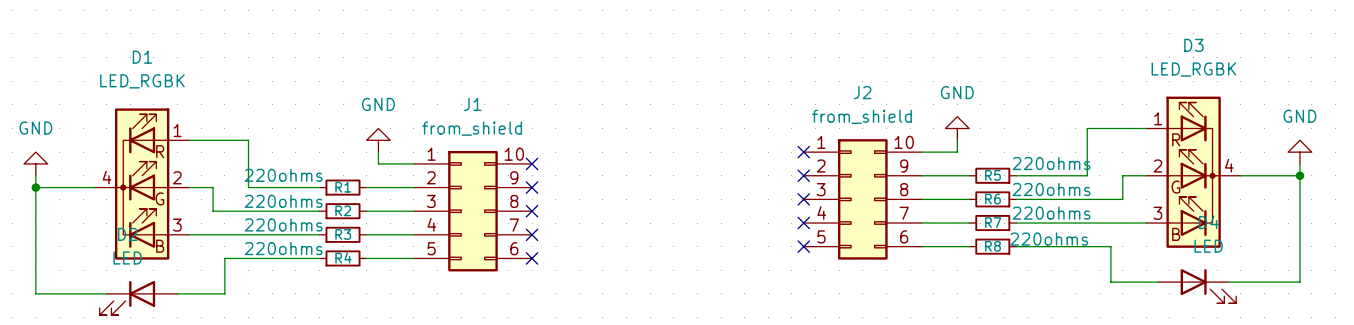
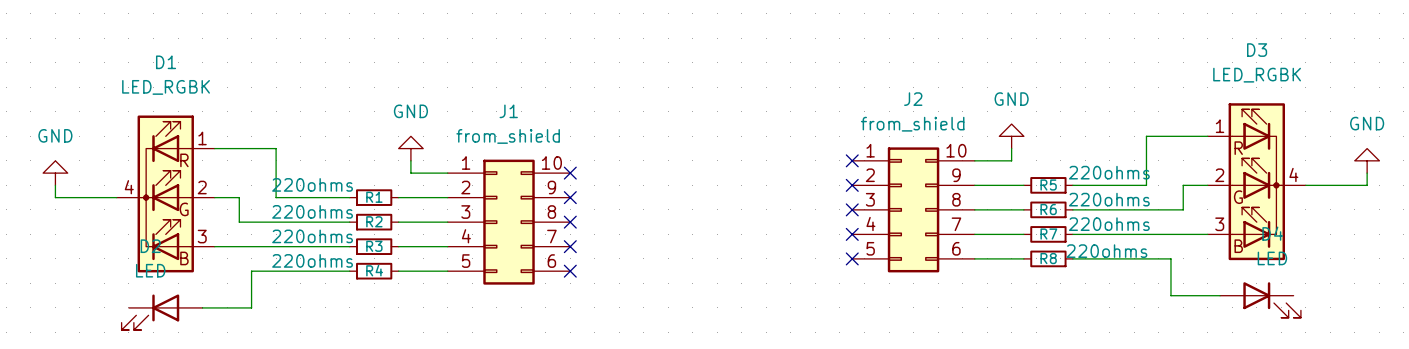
wire: (1299, 175) (1299, 282) (1229, 282) -> none
junction: (1299, 175) -> none
wire: (35, 187) (35, 293) (106, 293) -> none
junction: (35, 187) -> none

